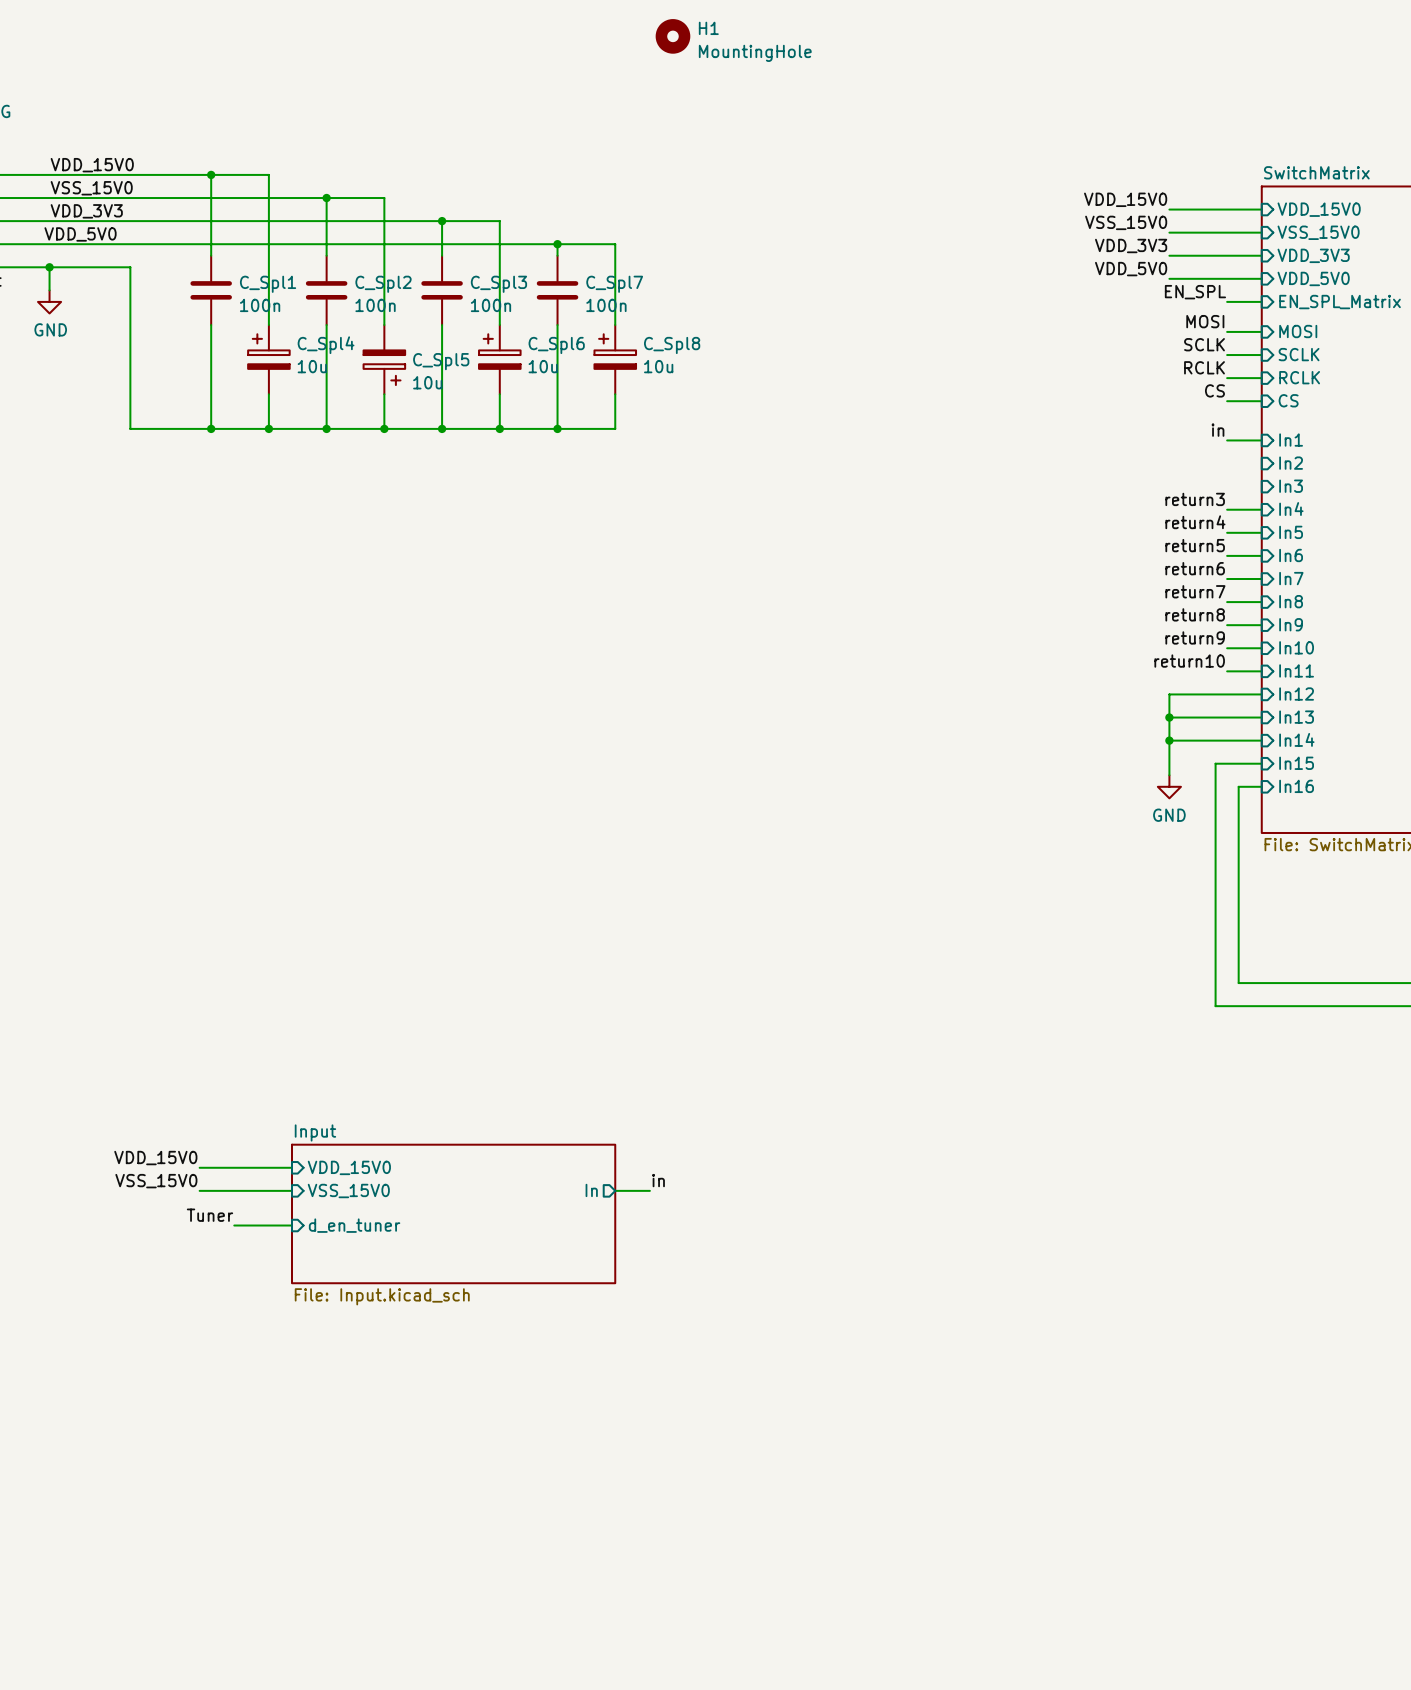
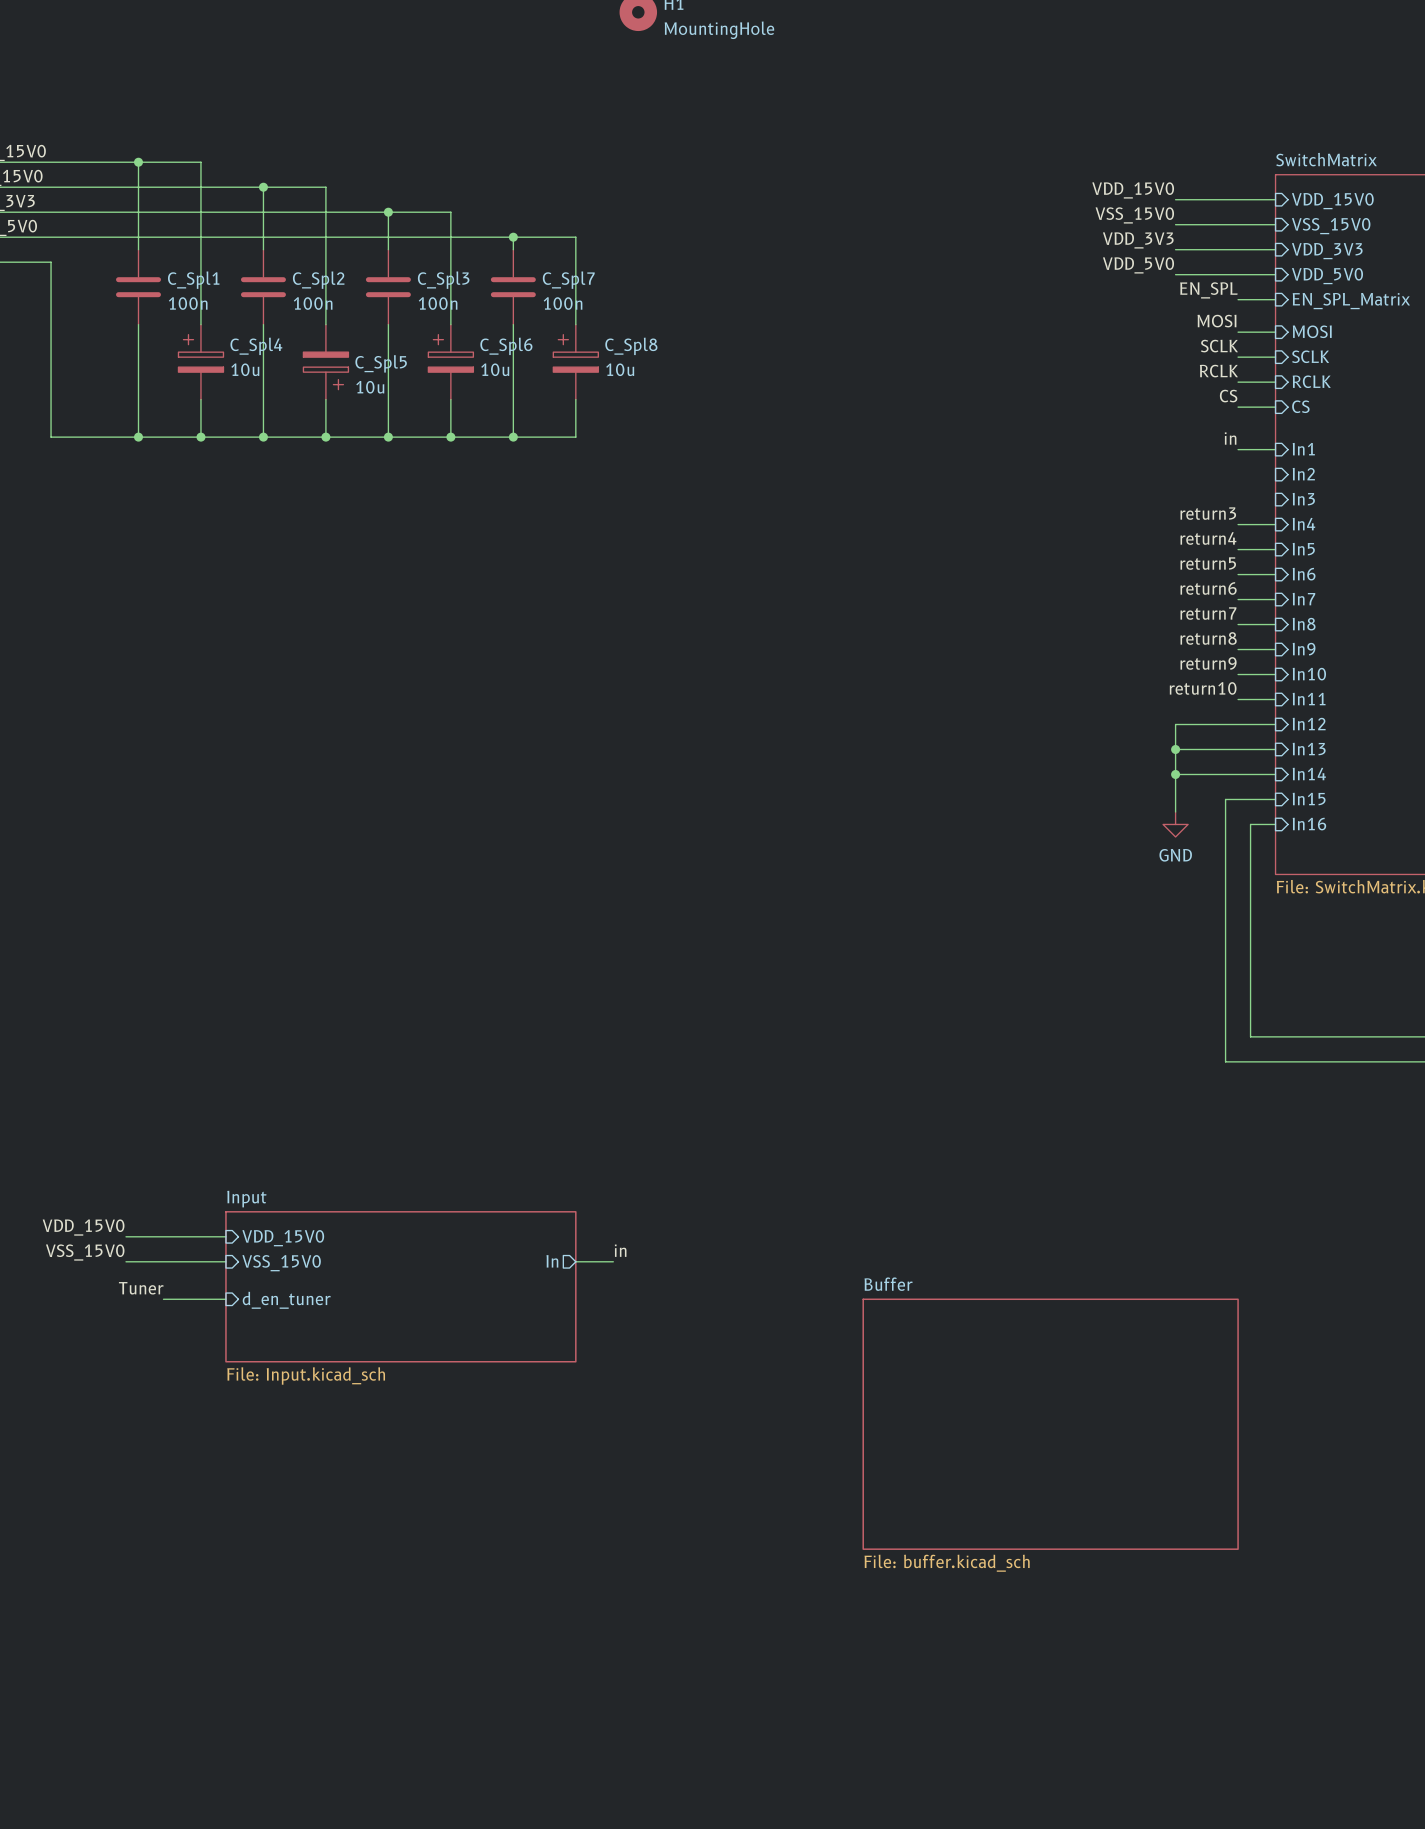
sheet Buffer: none -> File: buffer.kicad_sch (1050, 1424)

